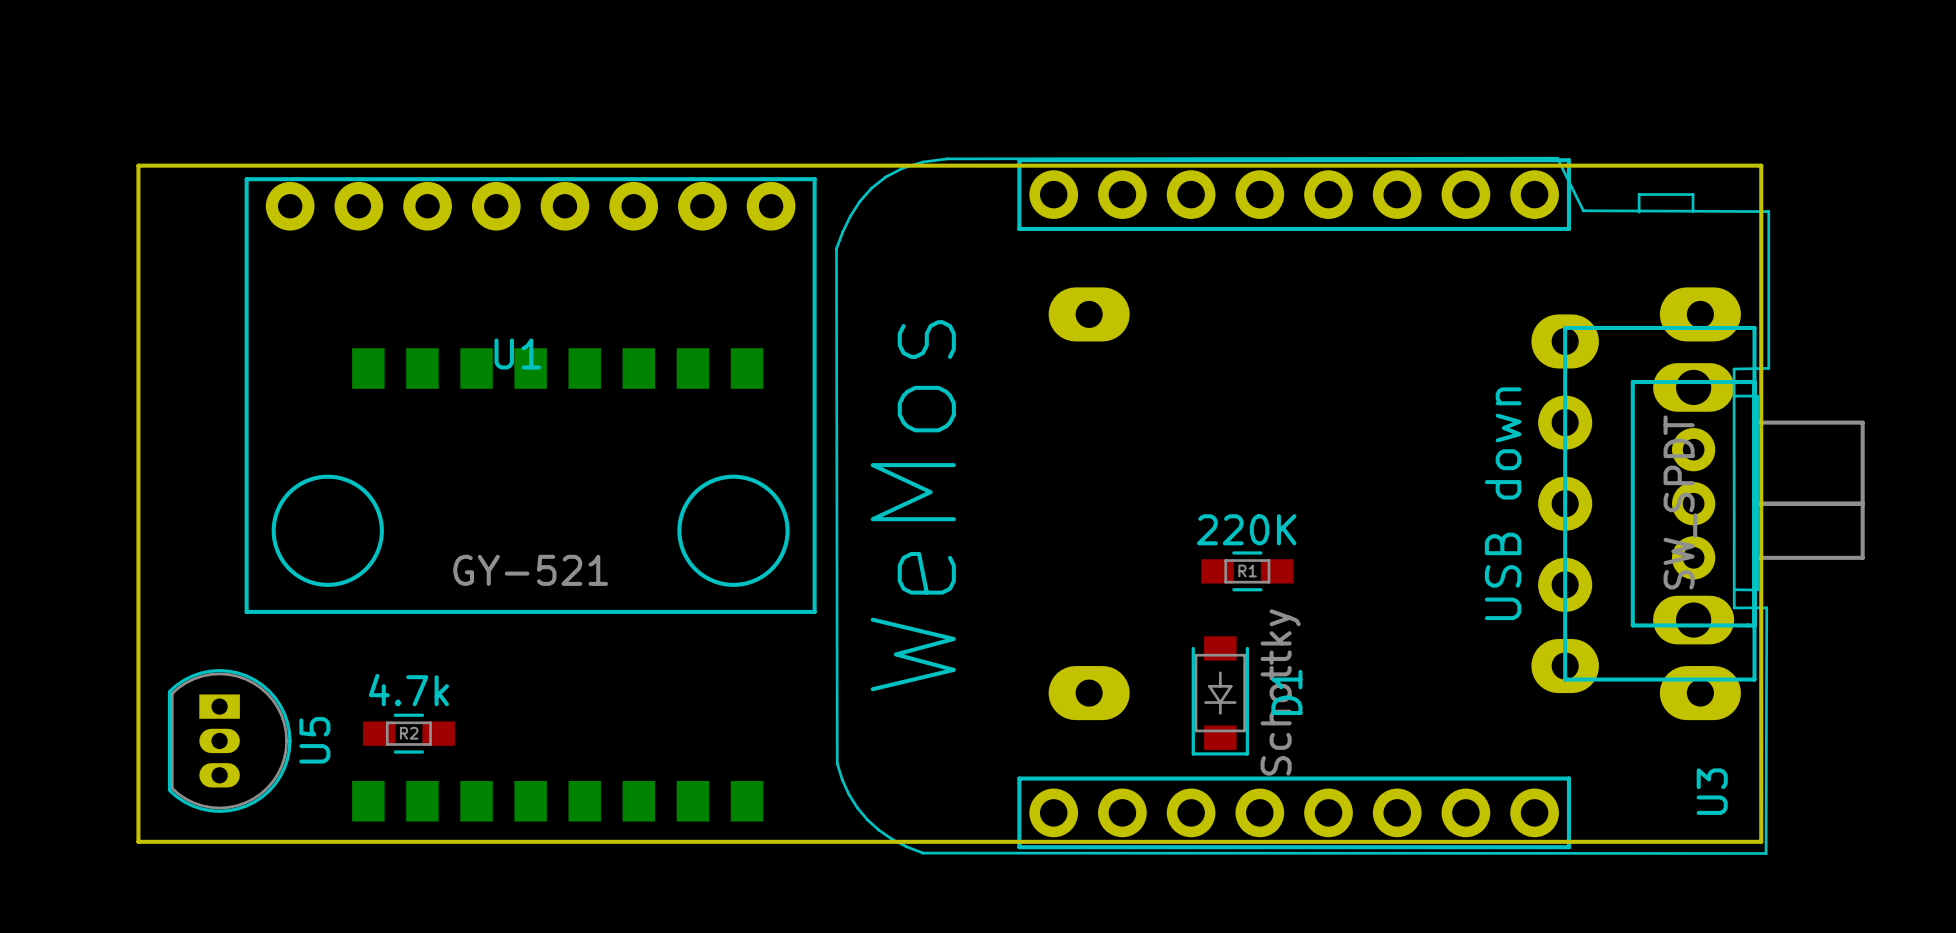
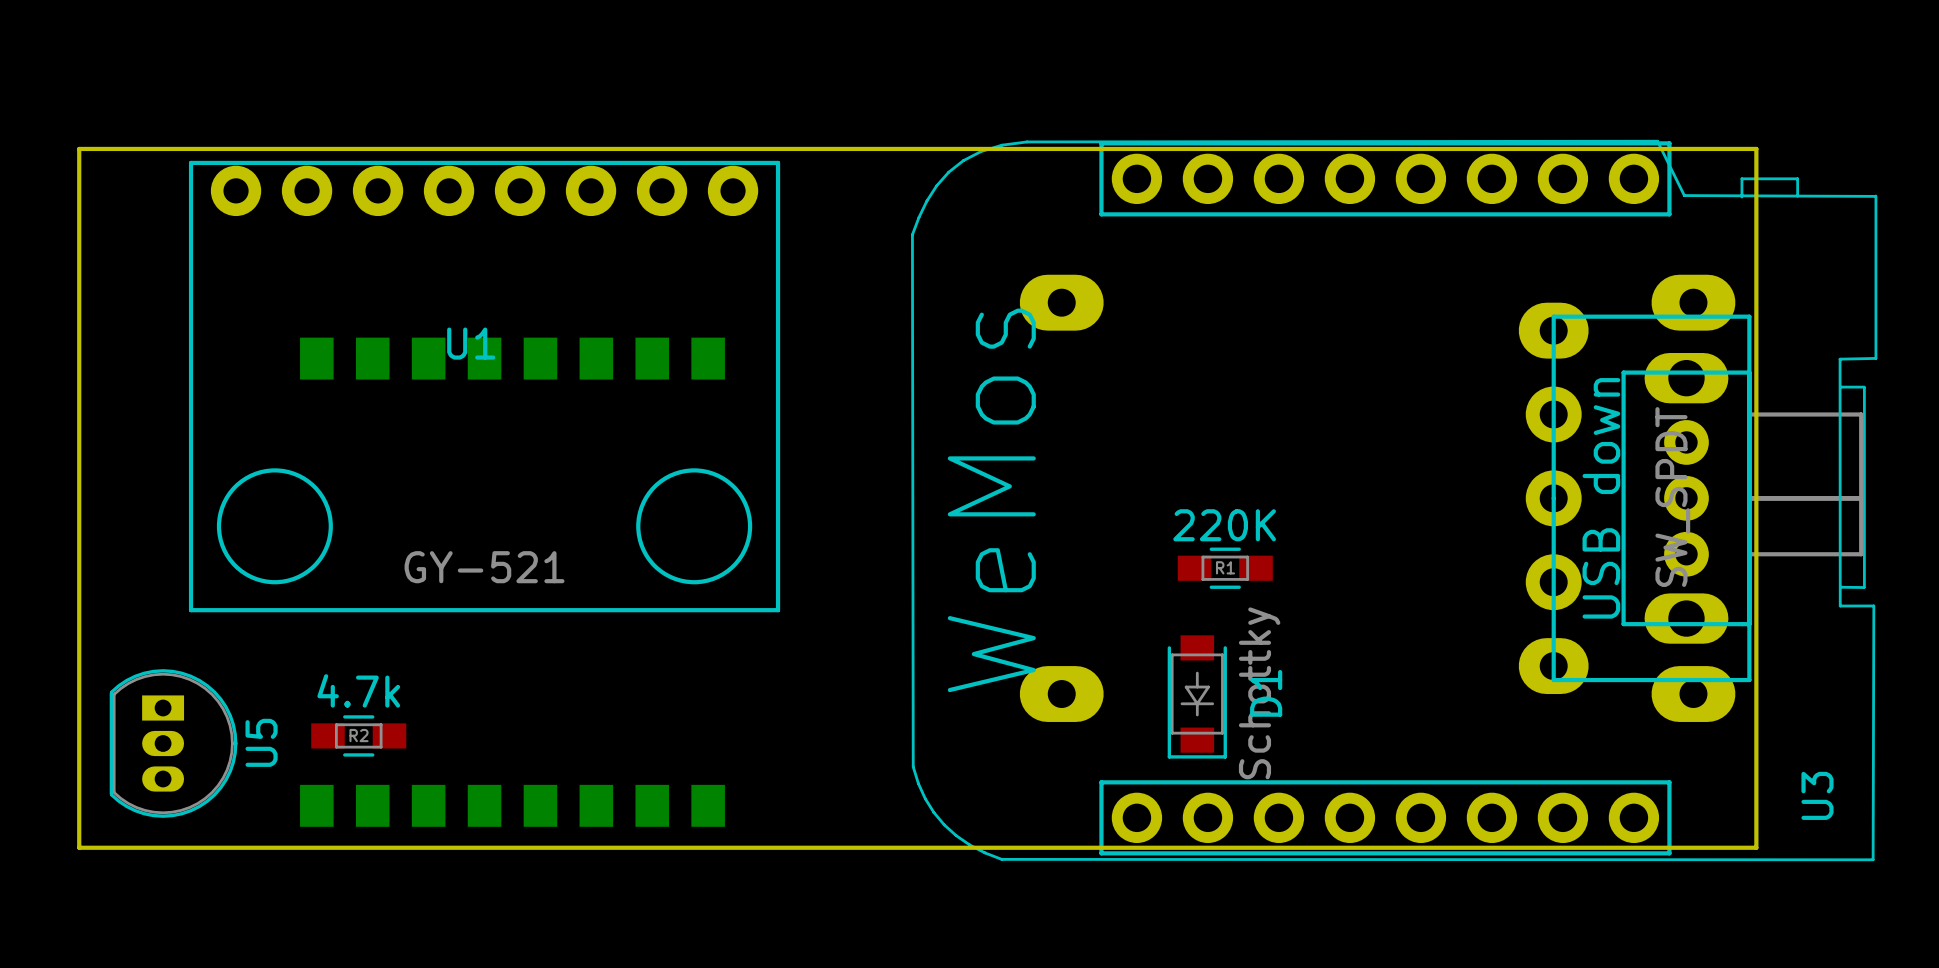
U3 position: (1302, 505) -> (1394, 500)

